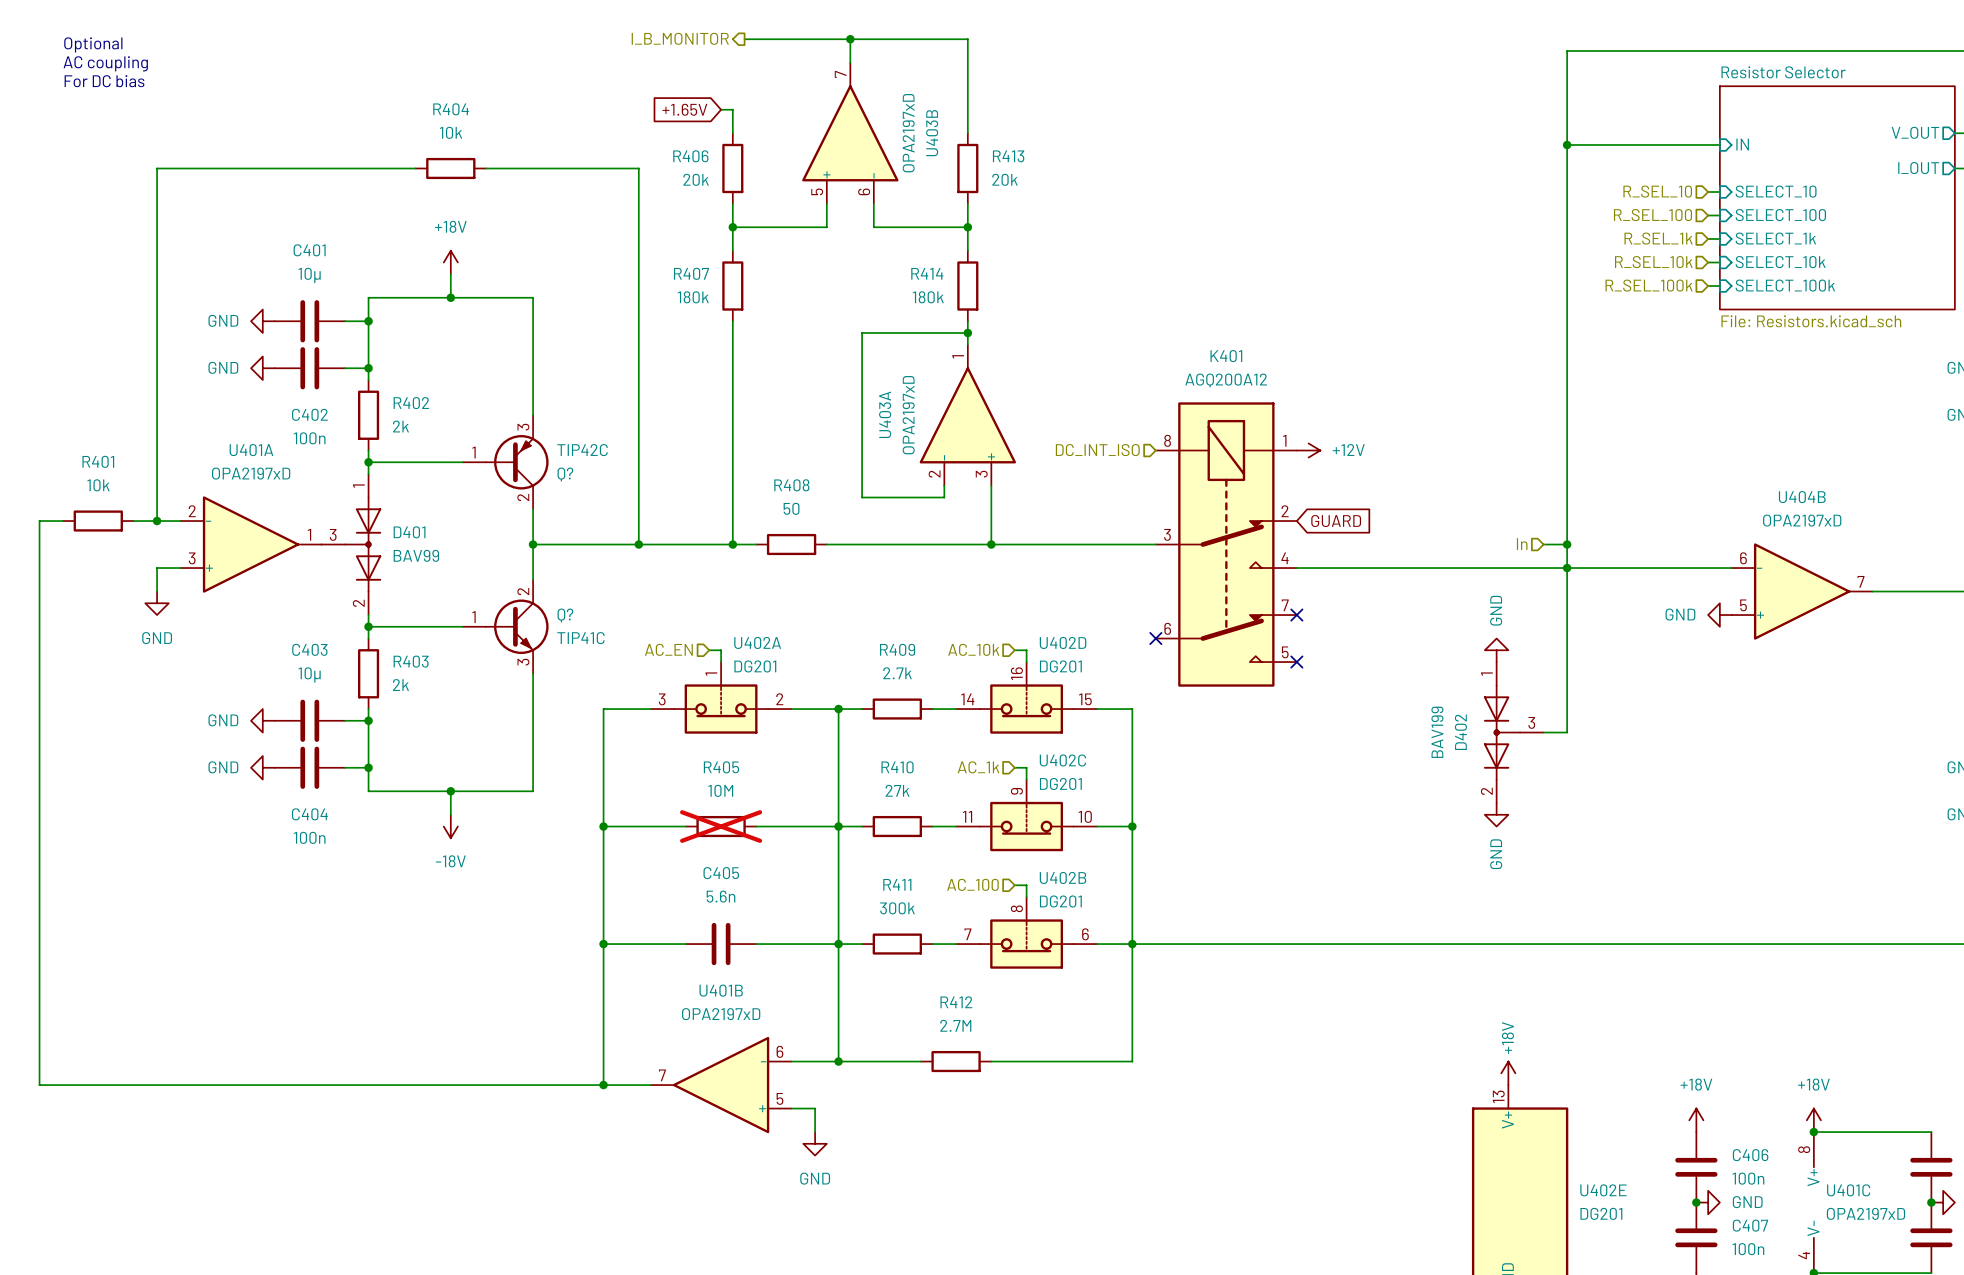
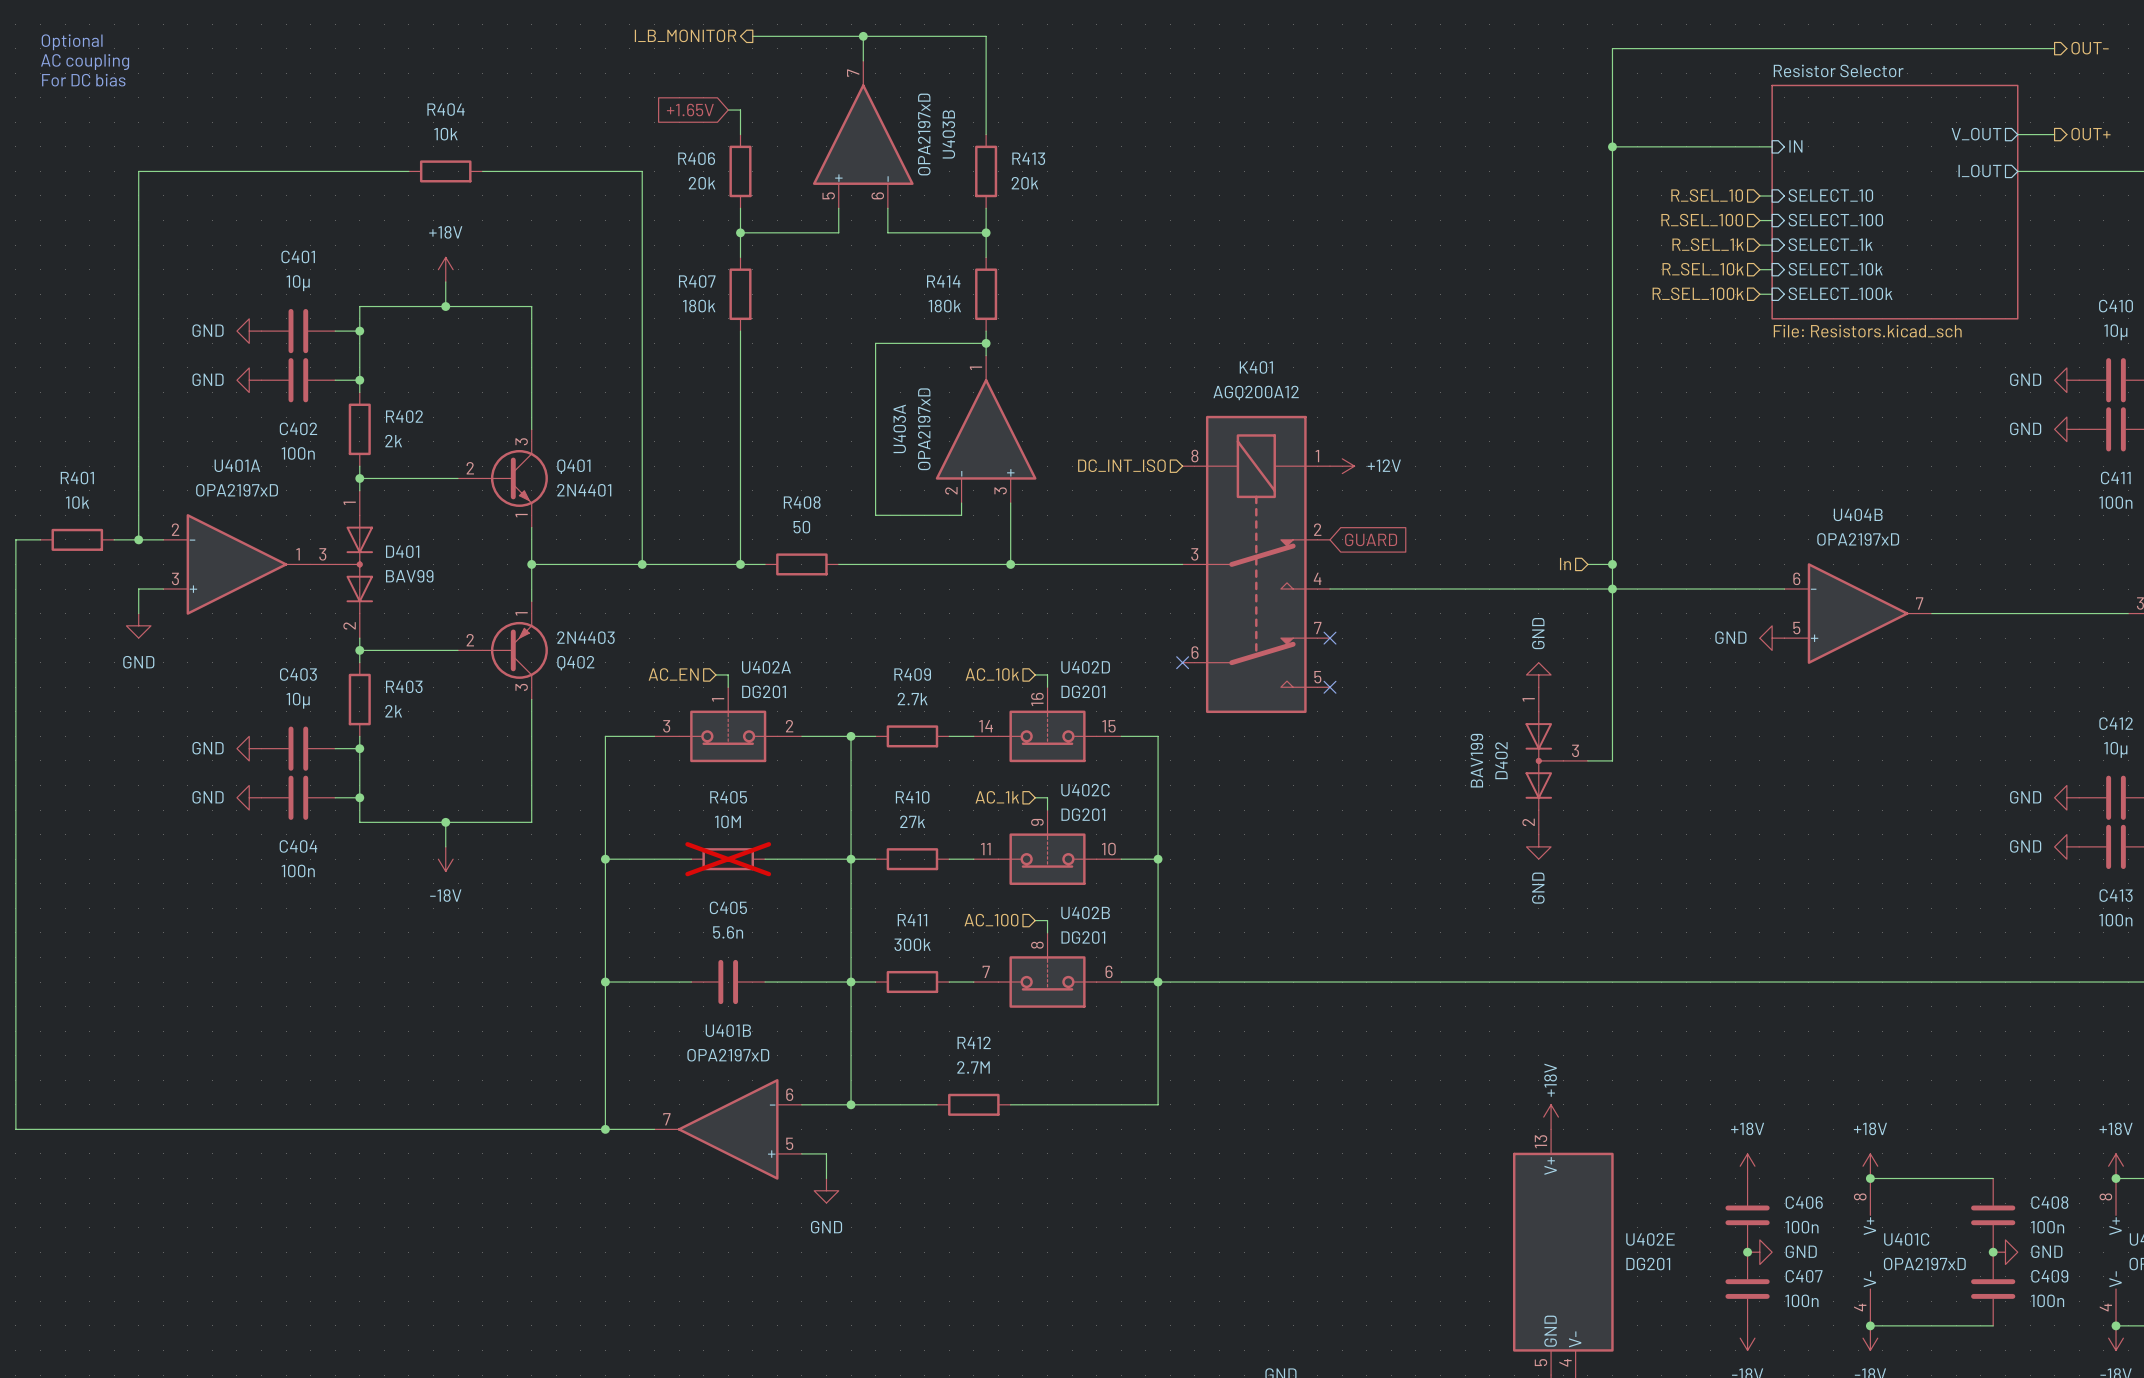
Q?: TIP42C (505, 462) -> none
Q401: none -> 2N4401 (502, 478)
Q?: TIP41C (505, 626) -> none
Q402: none -> 2N4403 (502, 650)

